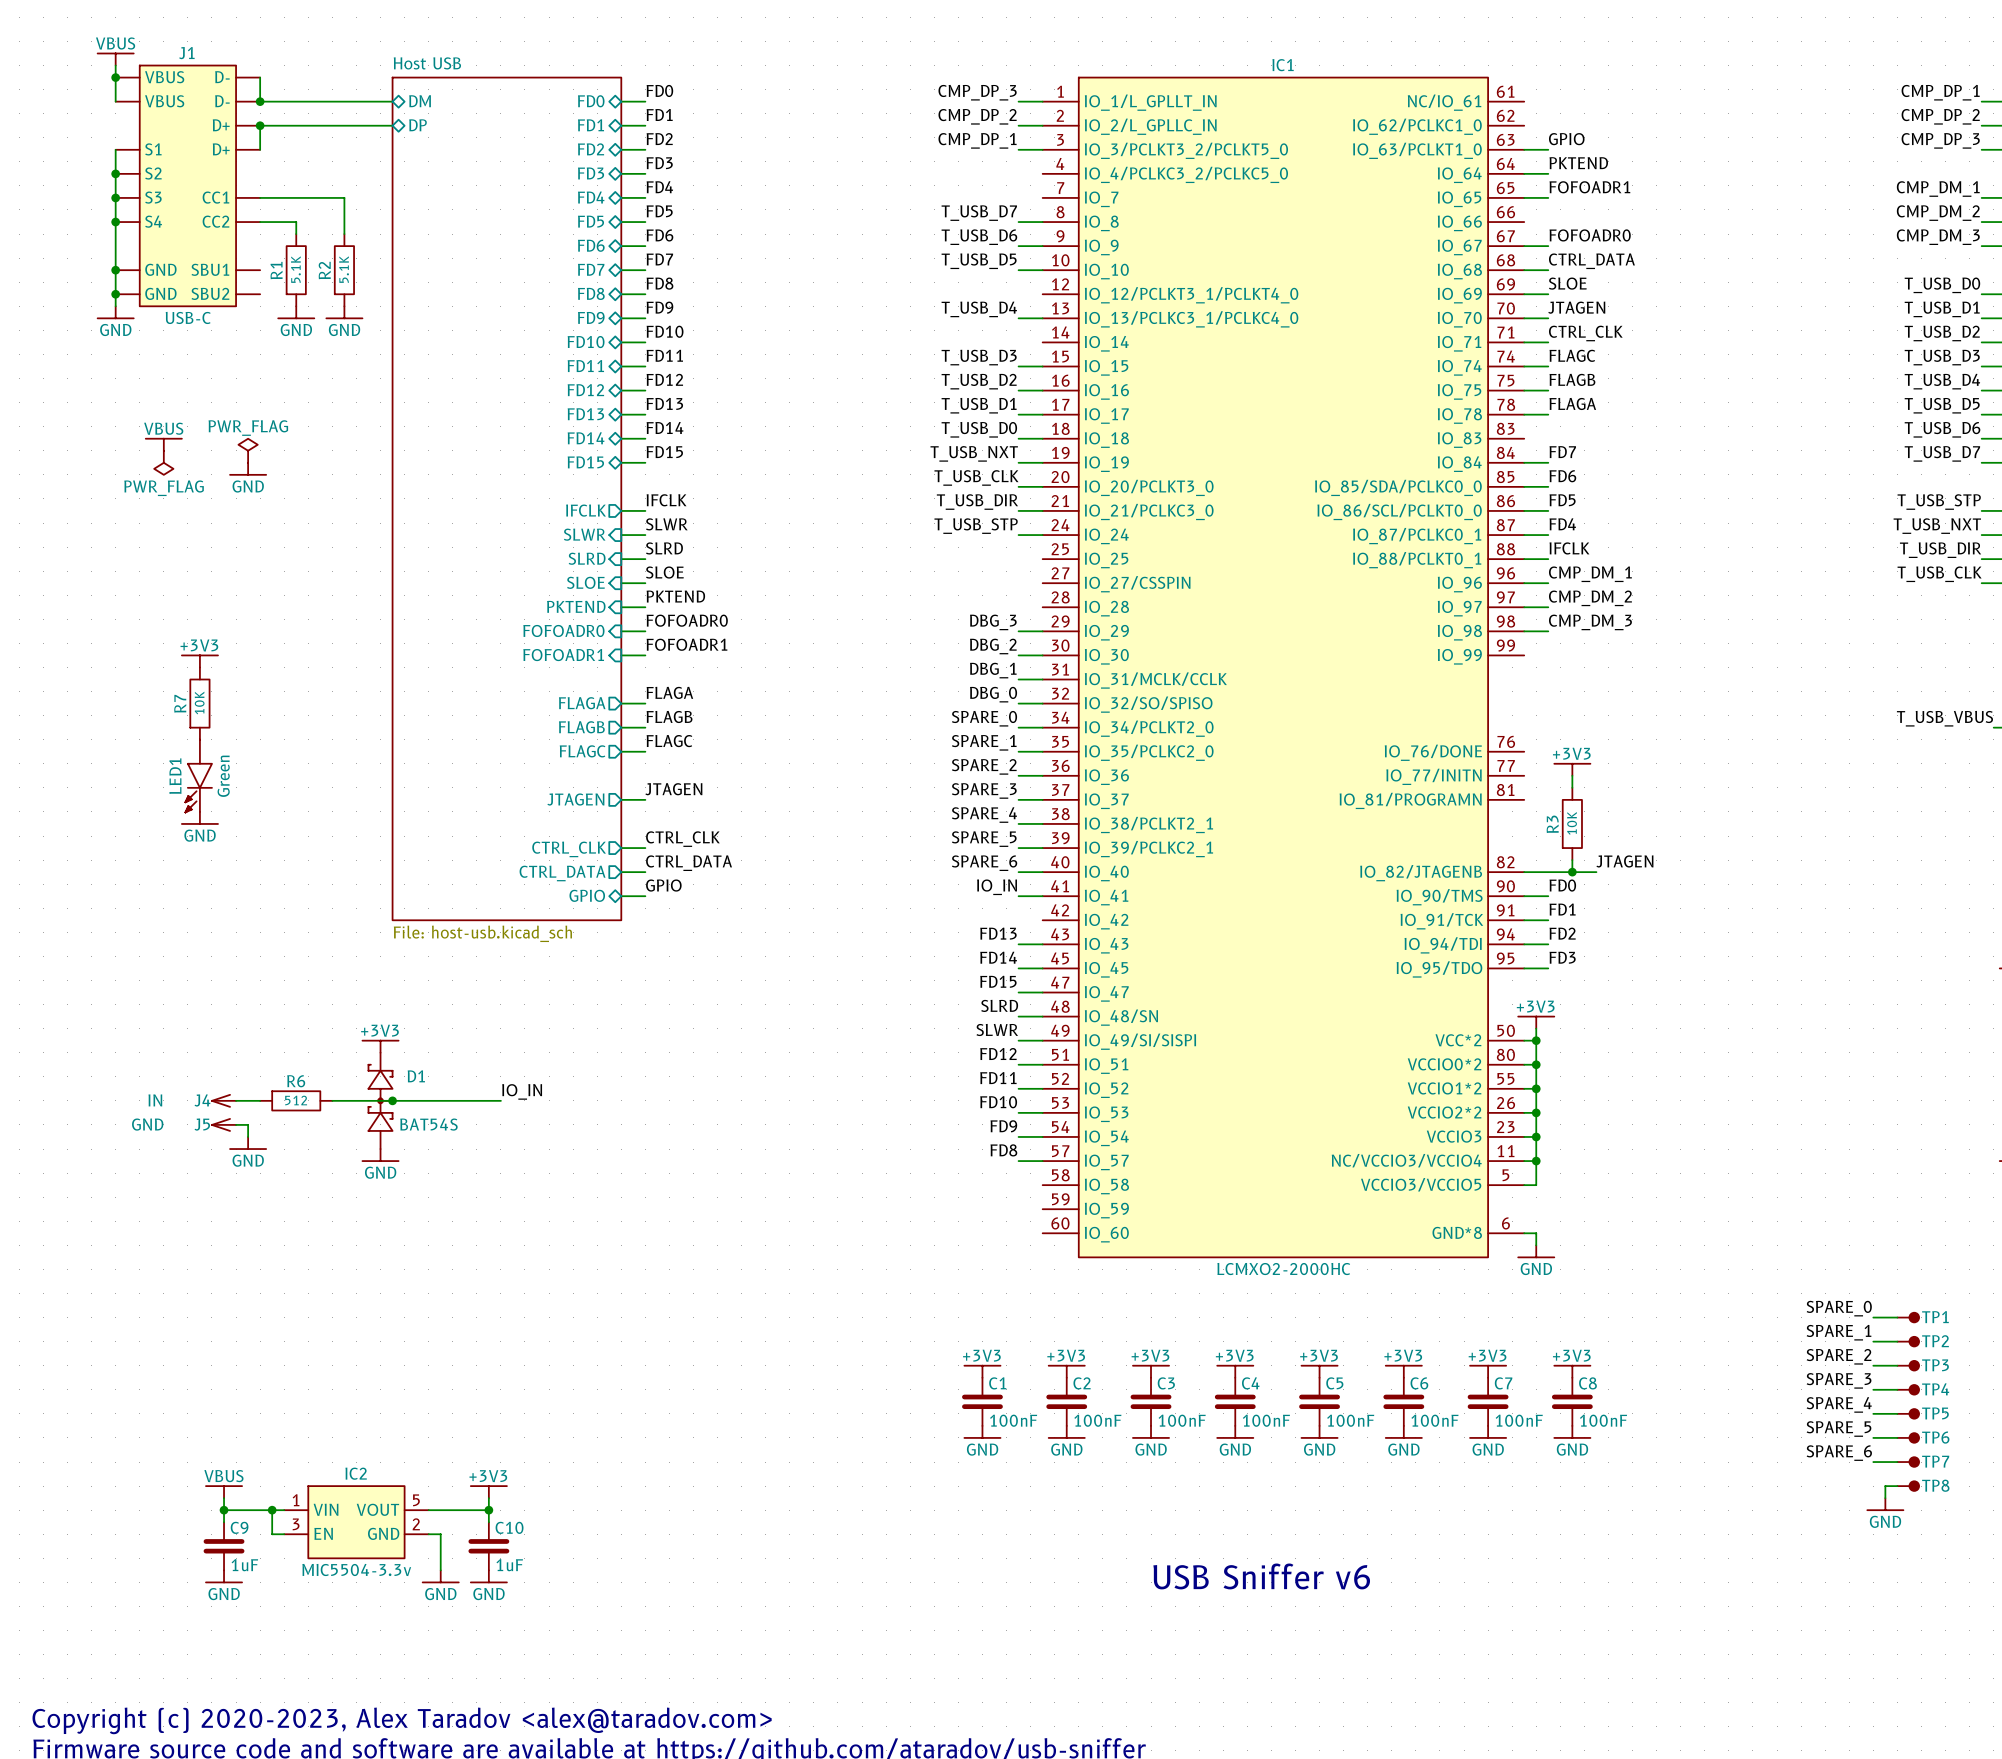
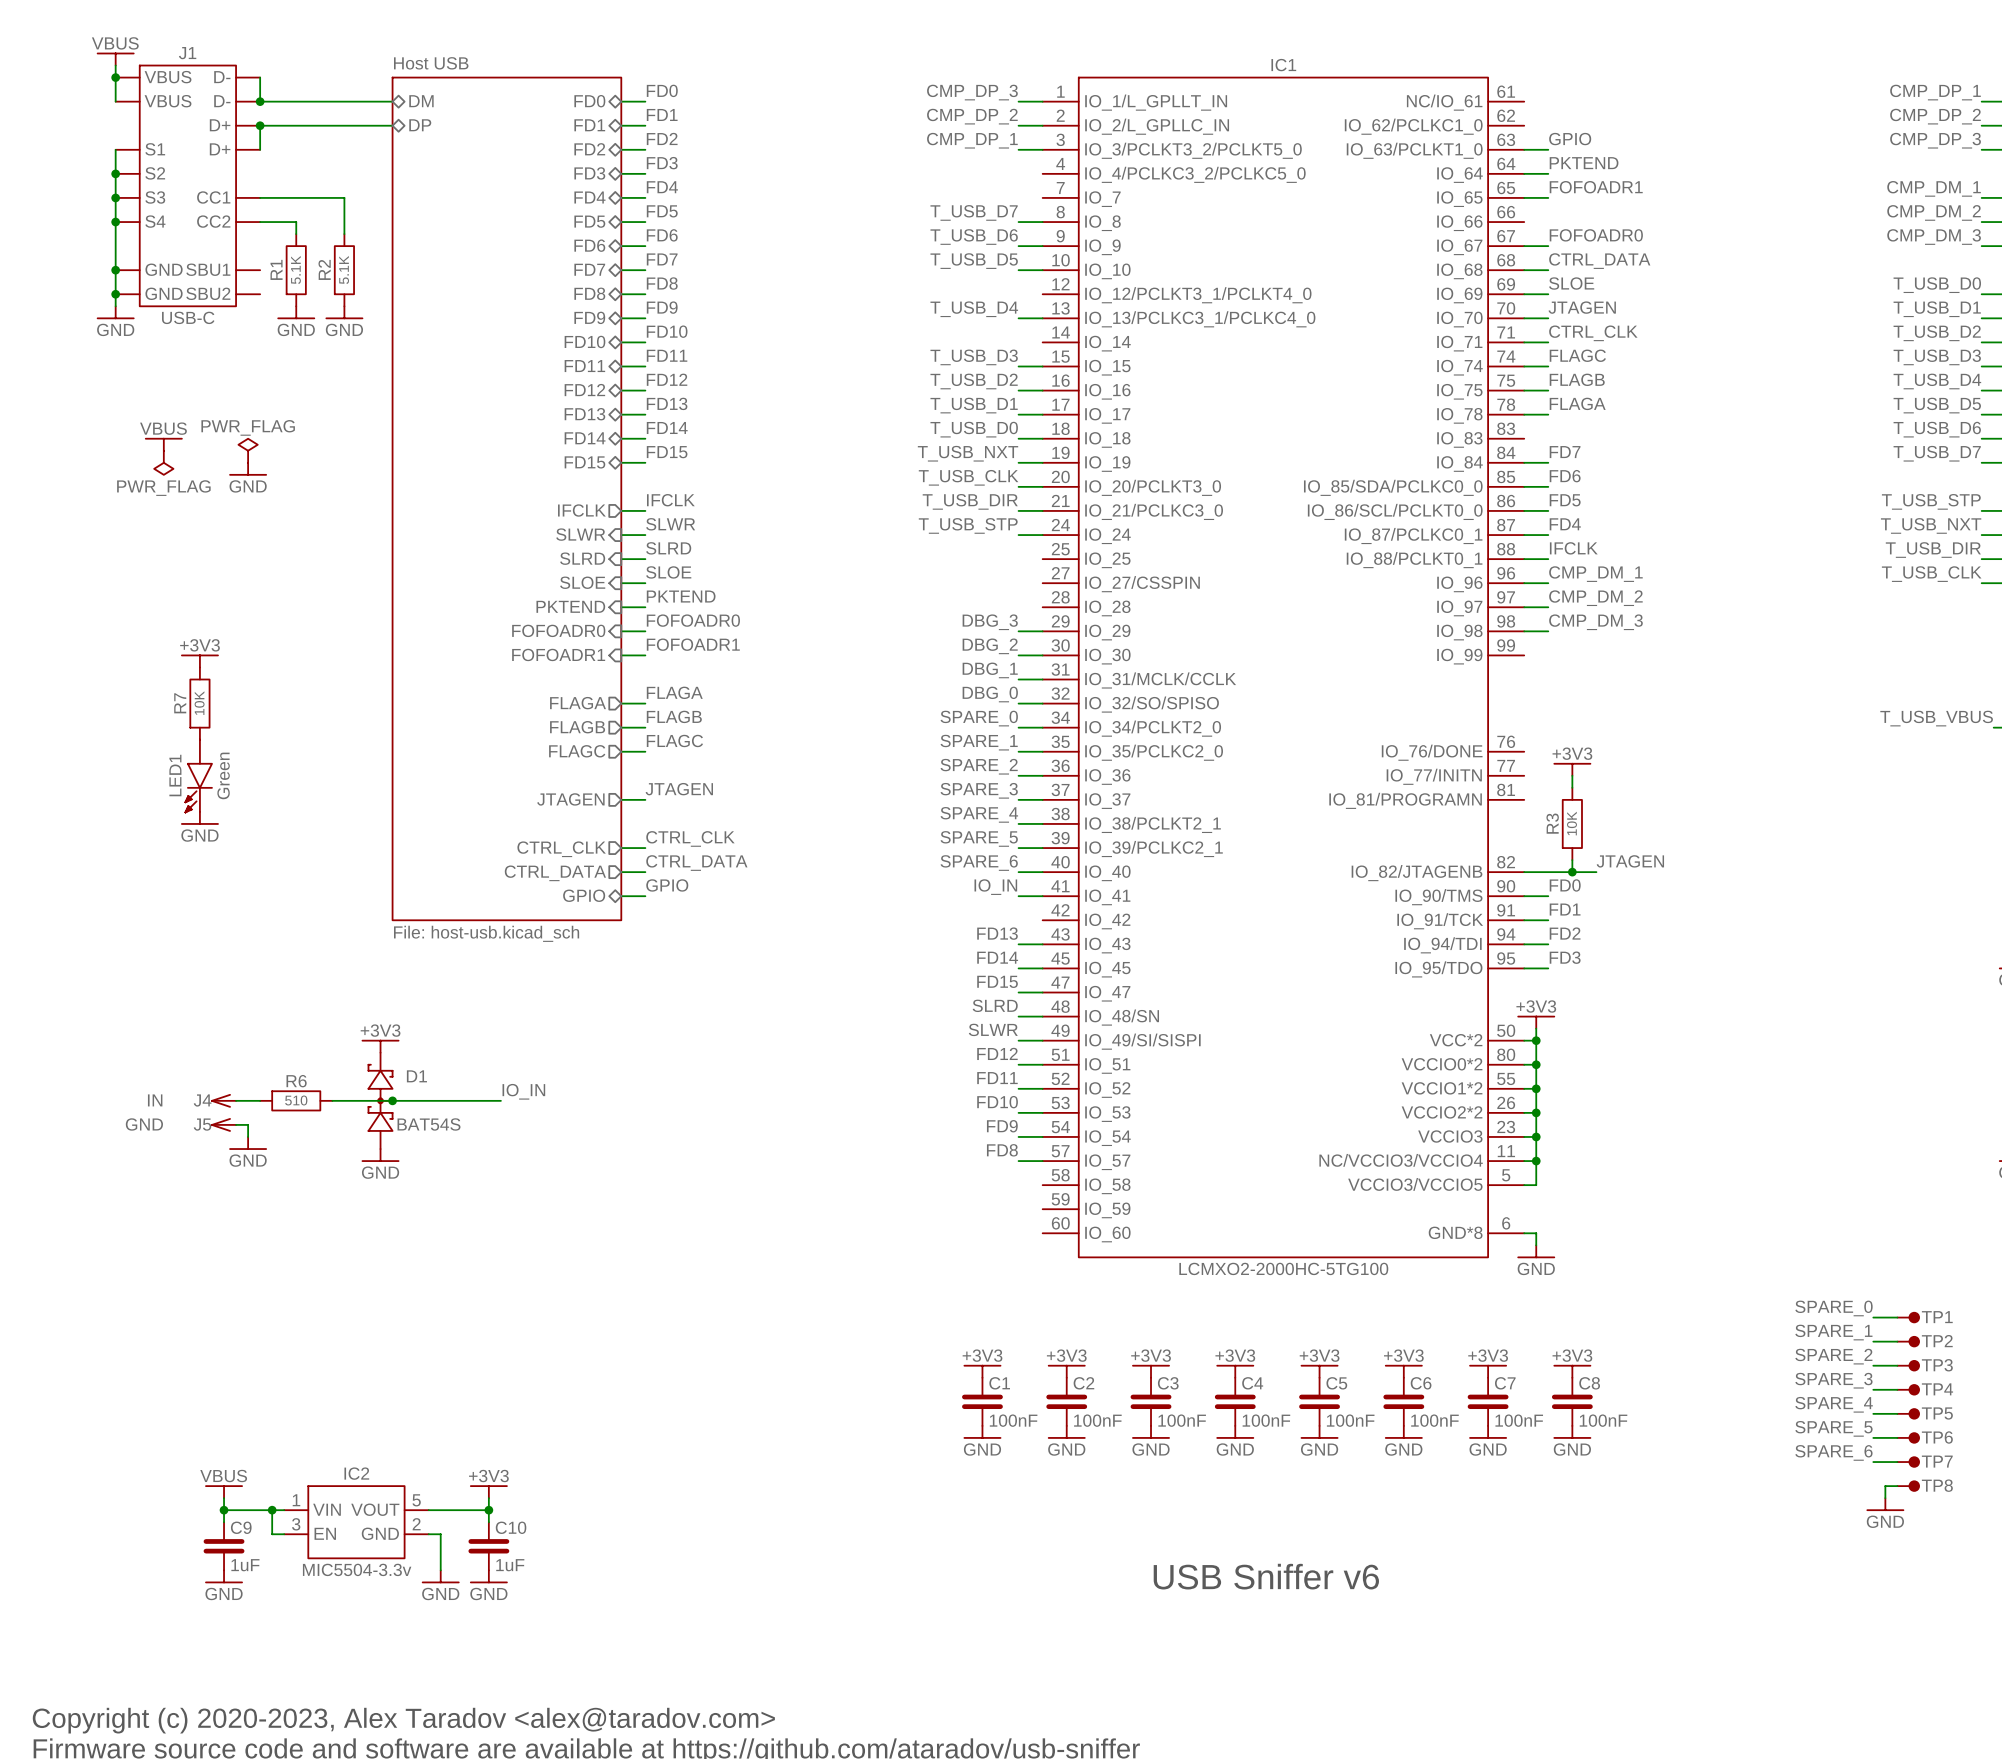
R6 value: 512 (296, 1100) -> 510 (296, 1100)
IC1 value: LCMXO2-2000HC (1283, 1269) -> LCMXO2-2000HC-5TG100 (1283, 1268)

